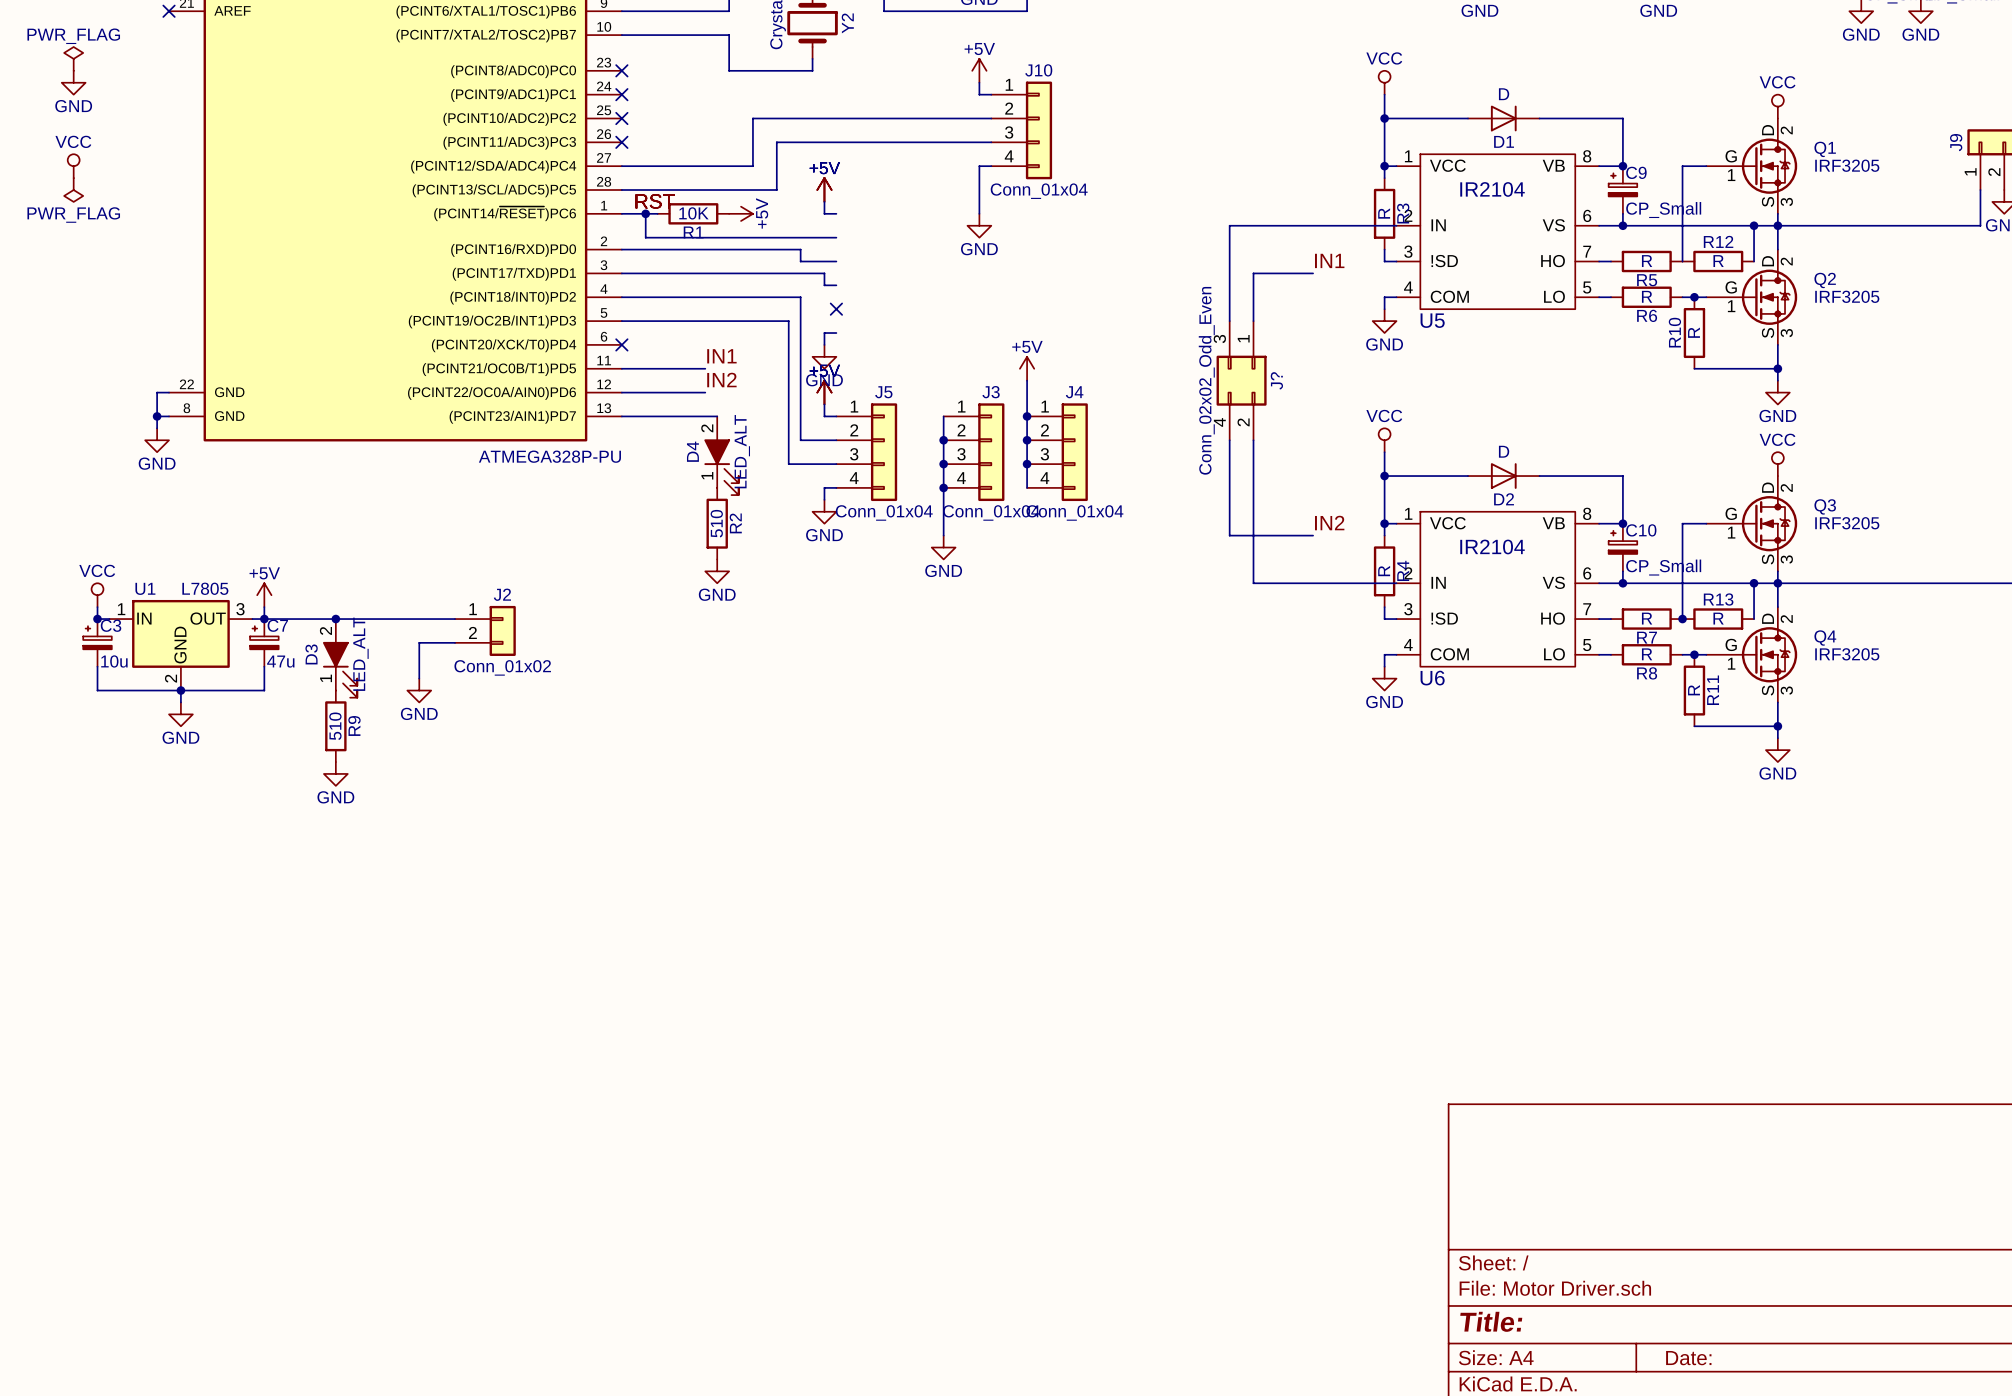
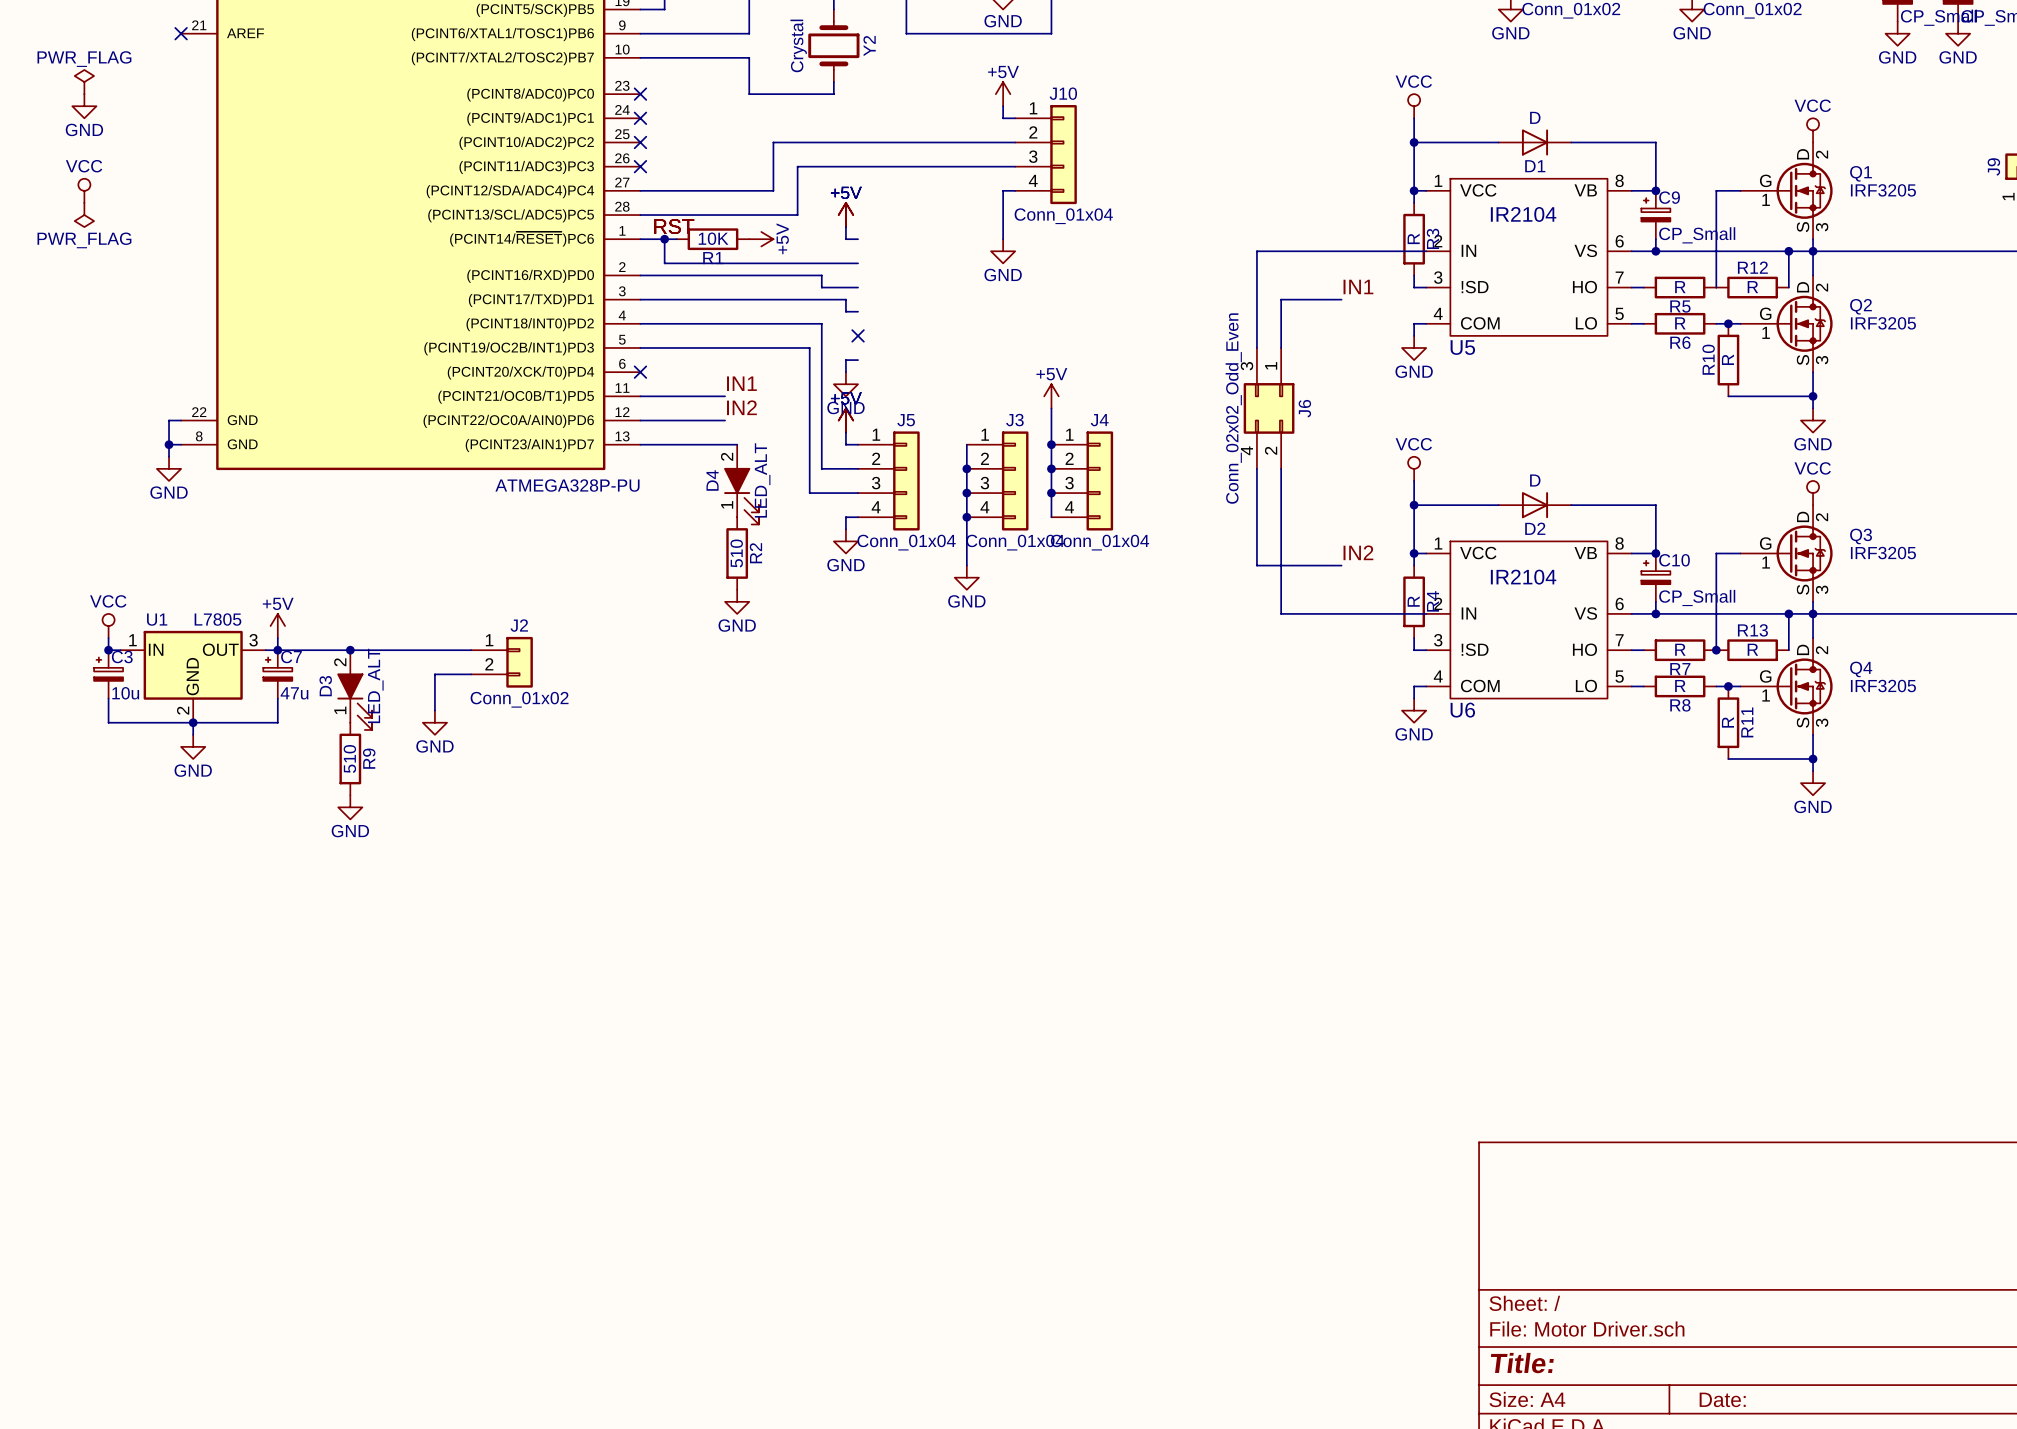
J? name: J? (1276, 380) -> J6 (1304, 408)

